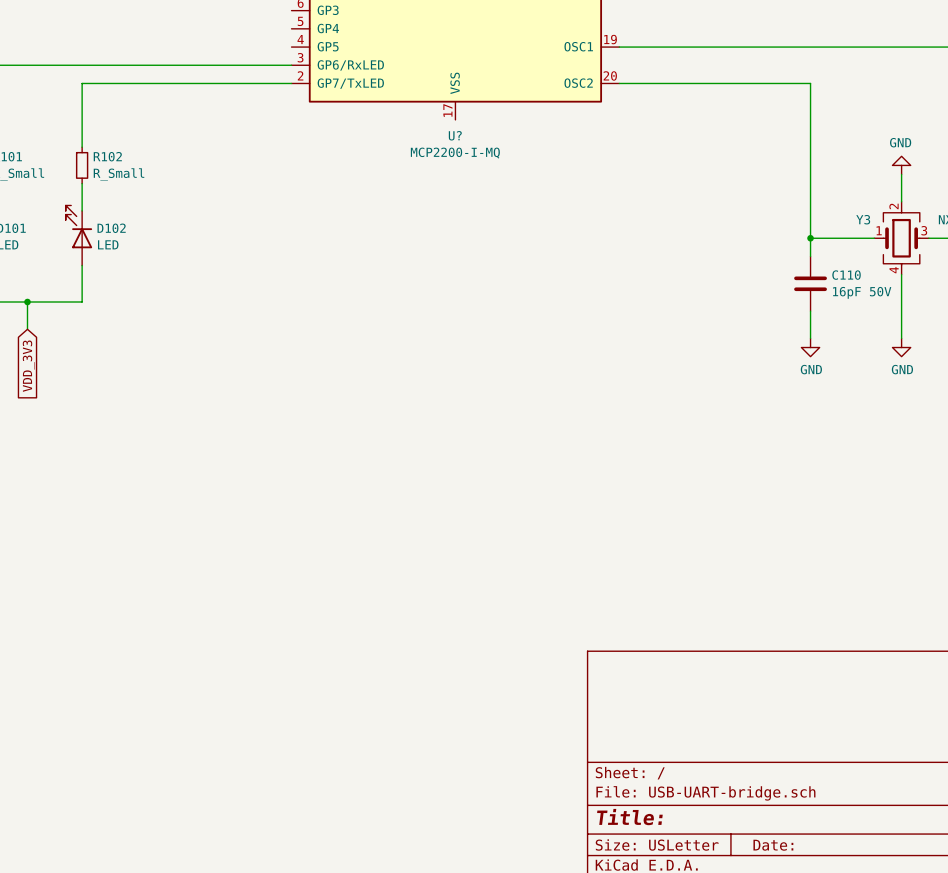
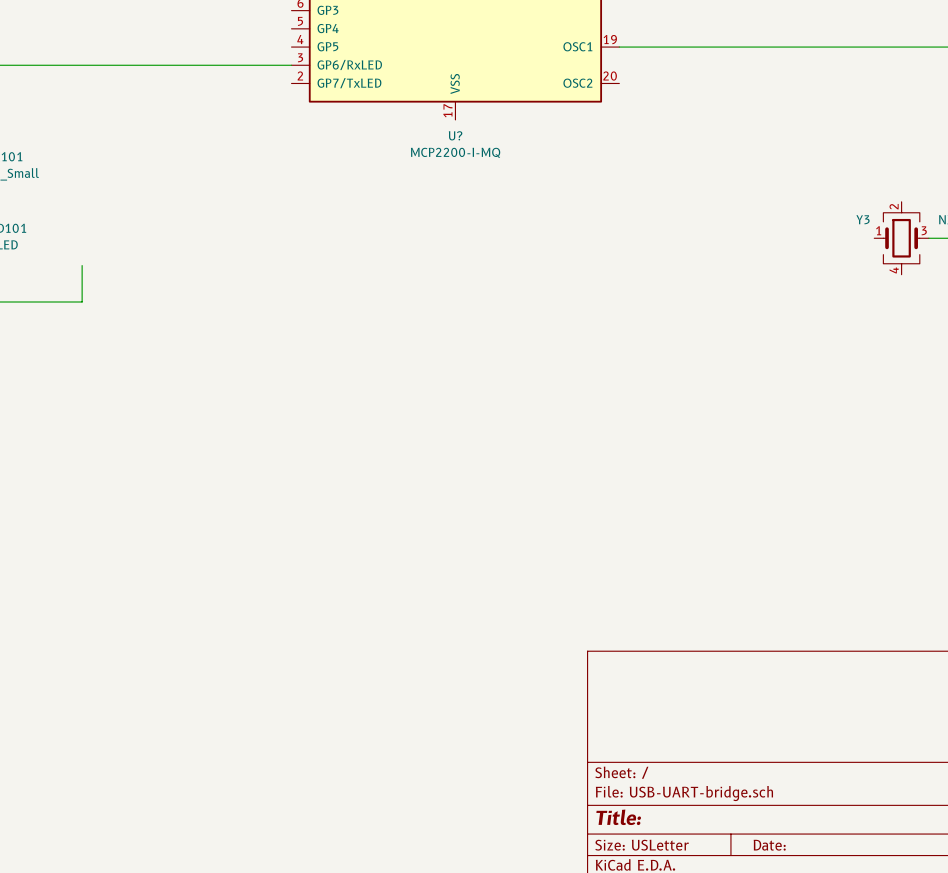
wire: (291, 83) (82, 83) (82, 147) -> none
wire: (619, 83) (810, 83) (810, 256) -> none
R102: R_Small (82, 165) -> none
power symbol: GND (901, 165) -> none
wire: (901, 174) (901, 201) -> none
wire: (82, 183) (82, 210) -> none
D102: LED (78, 235) -> none
wire: (810, 238) (874, 238) -> none
junction: (810, 238) -> none
wire: (901, 274) (901, 338) -> none
C110: 16pF 50V (810, 283) -> none
wire: (27, 302) (27, 329) -> none
junction: (27, 302) -> none
wire: (810, 311) (810, 338) -> none
power symbol: GND (810, 347) -> none
power symbol: GND (901, 347) -> none
global label: VDD_3V3 (28, 366) -> none

